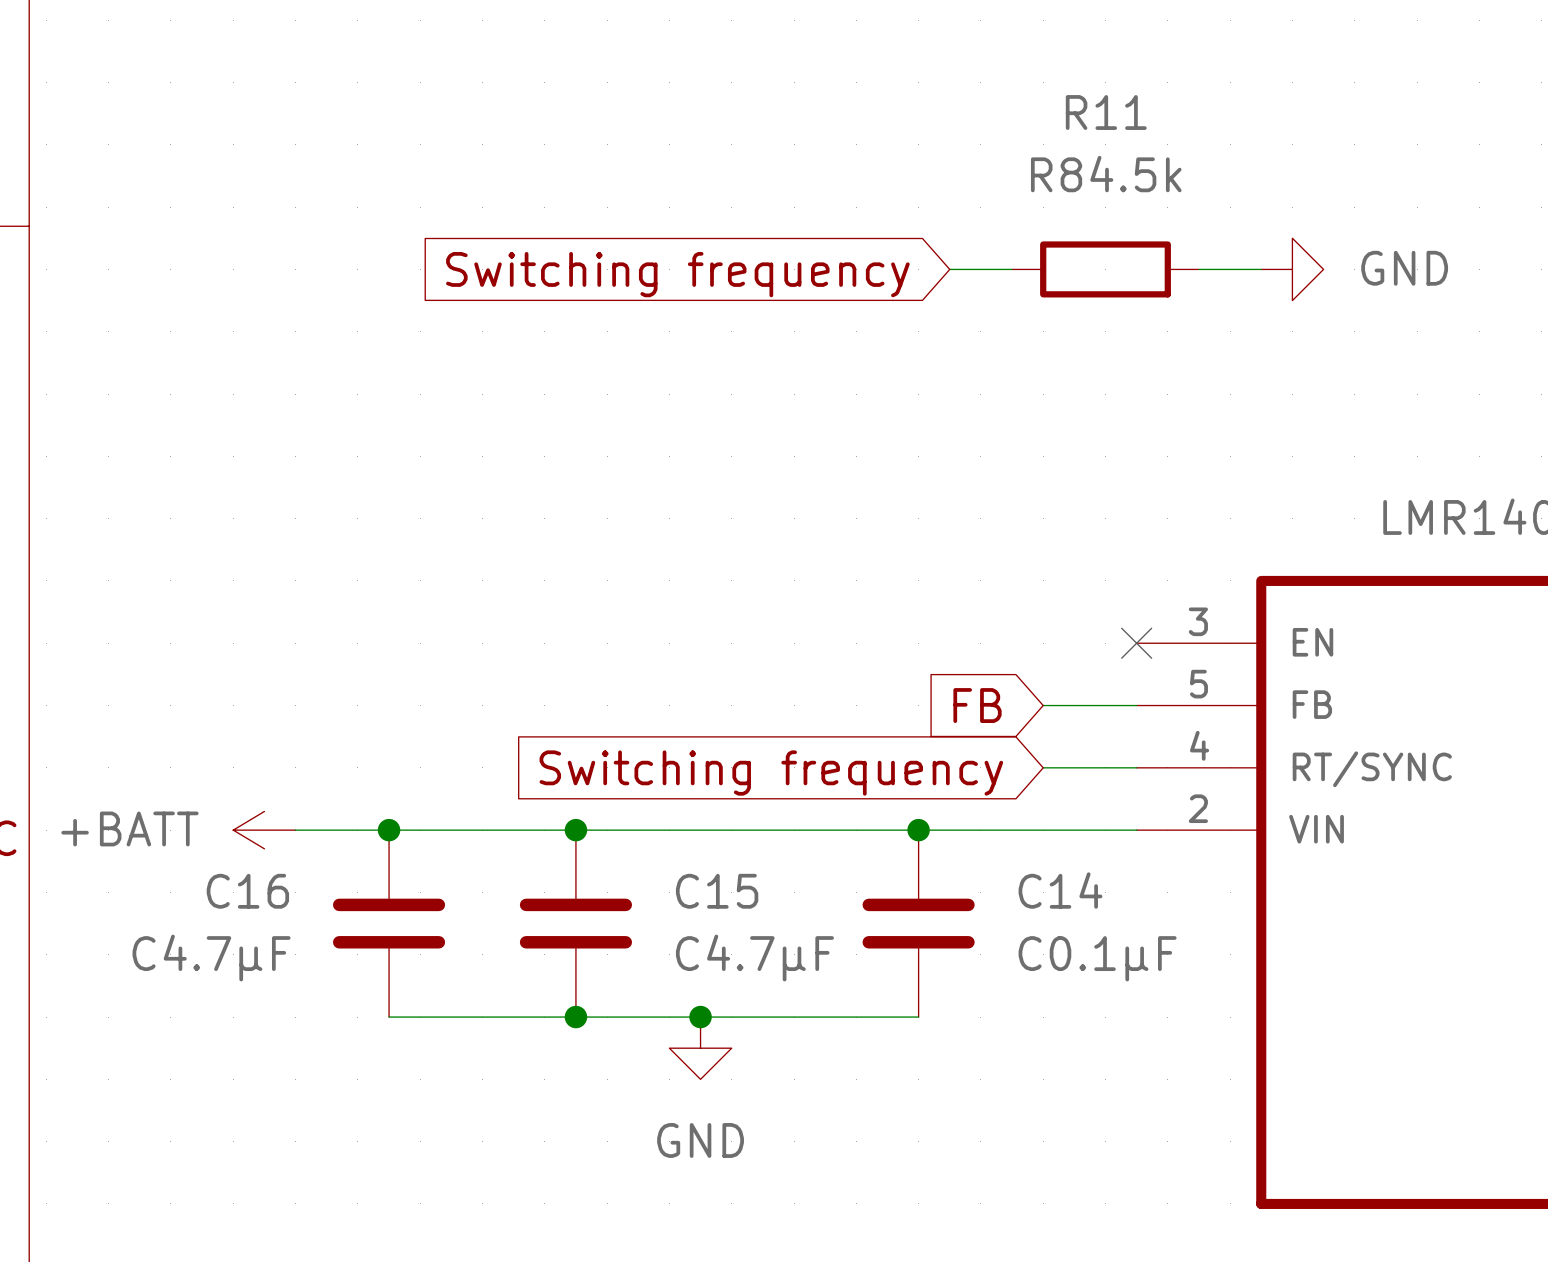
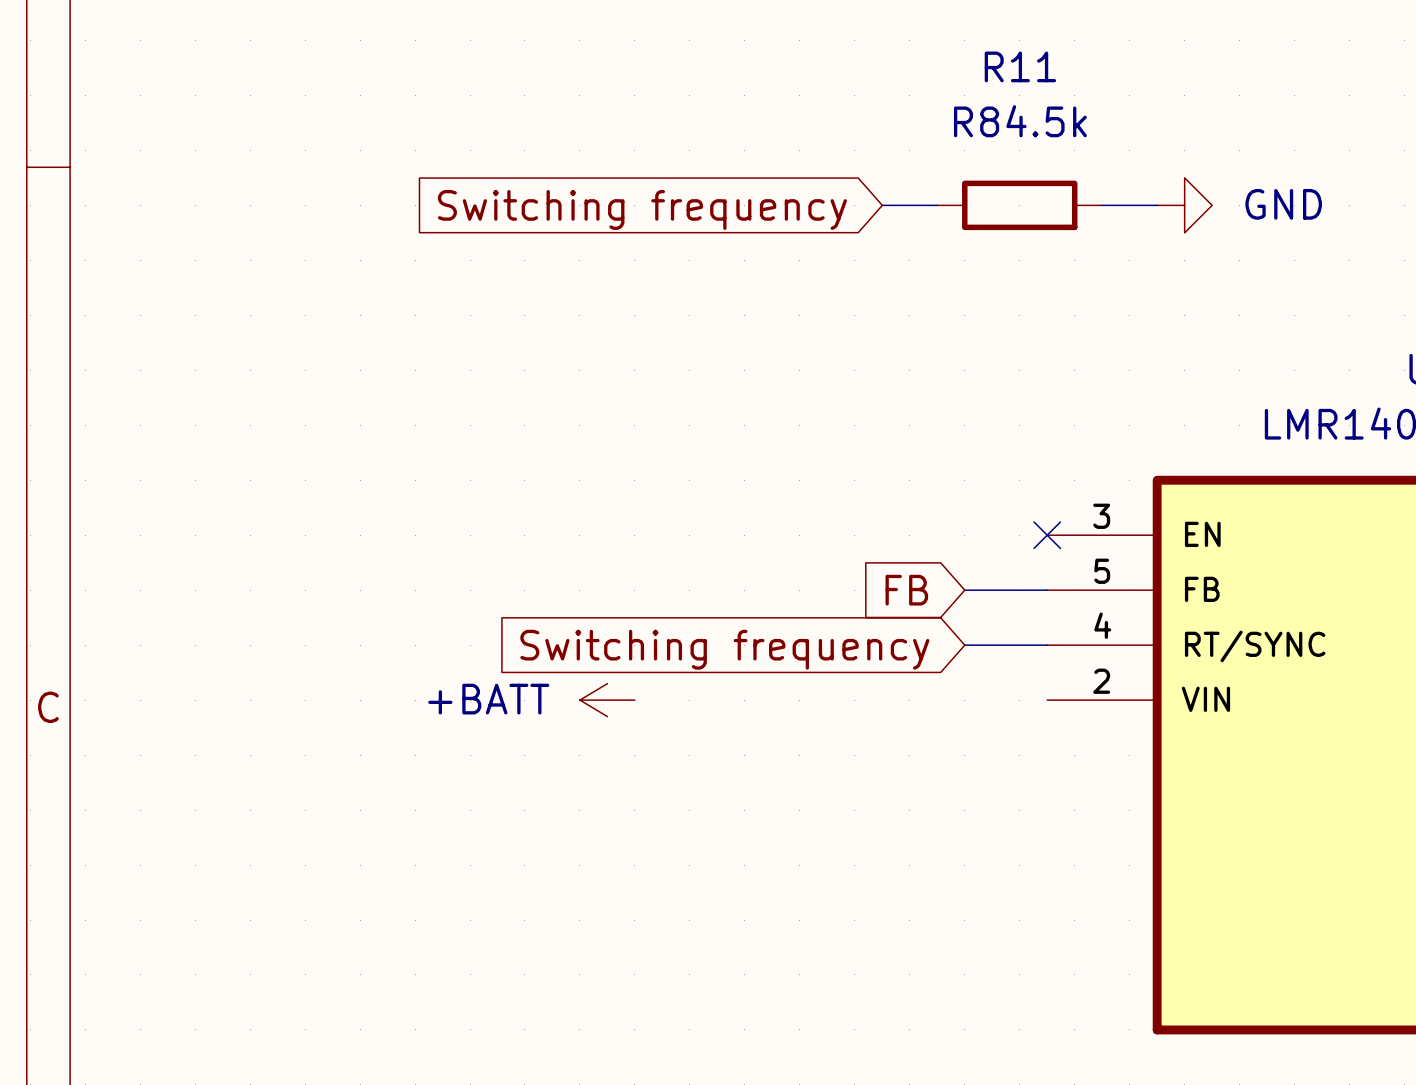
power symbol position: +BATT (264, 830) -> +BATT (607, 700)
wire: (295, 830) (1136, 830) -> none
junction: (389, 830) -> none
junction: (575, 830) -> none
junction: (918, 830) -> none
C16: C4.7µF (389, 923) -> none
C15: C4.7µF (575, 923) -> none
C14: C0.1µF (918, 923) -> none
wire: (389, 1017) (918, 1017) -> none
junction: (575, 1017) -> none
junction: (700, 1017) -> none
power symbol: GND (700, 1048) -> none

